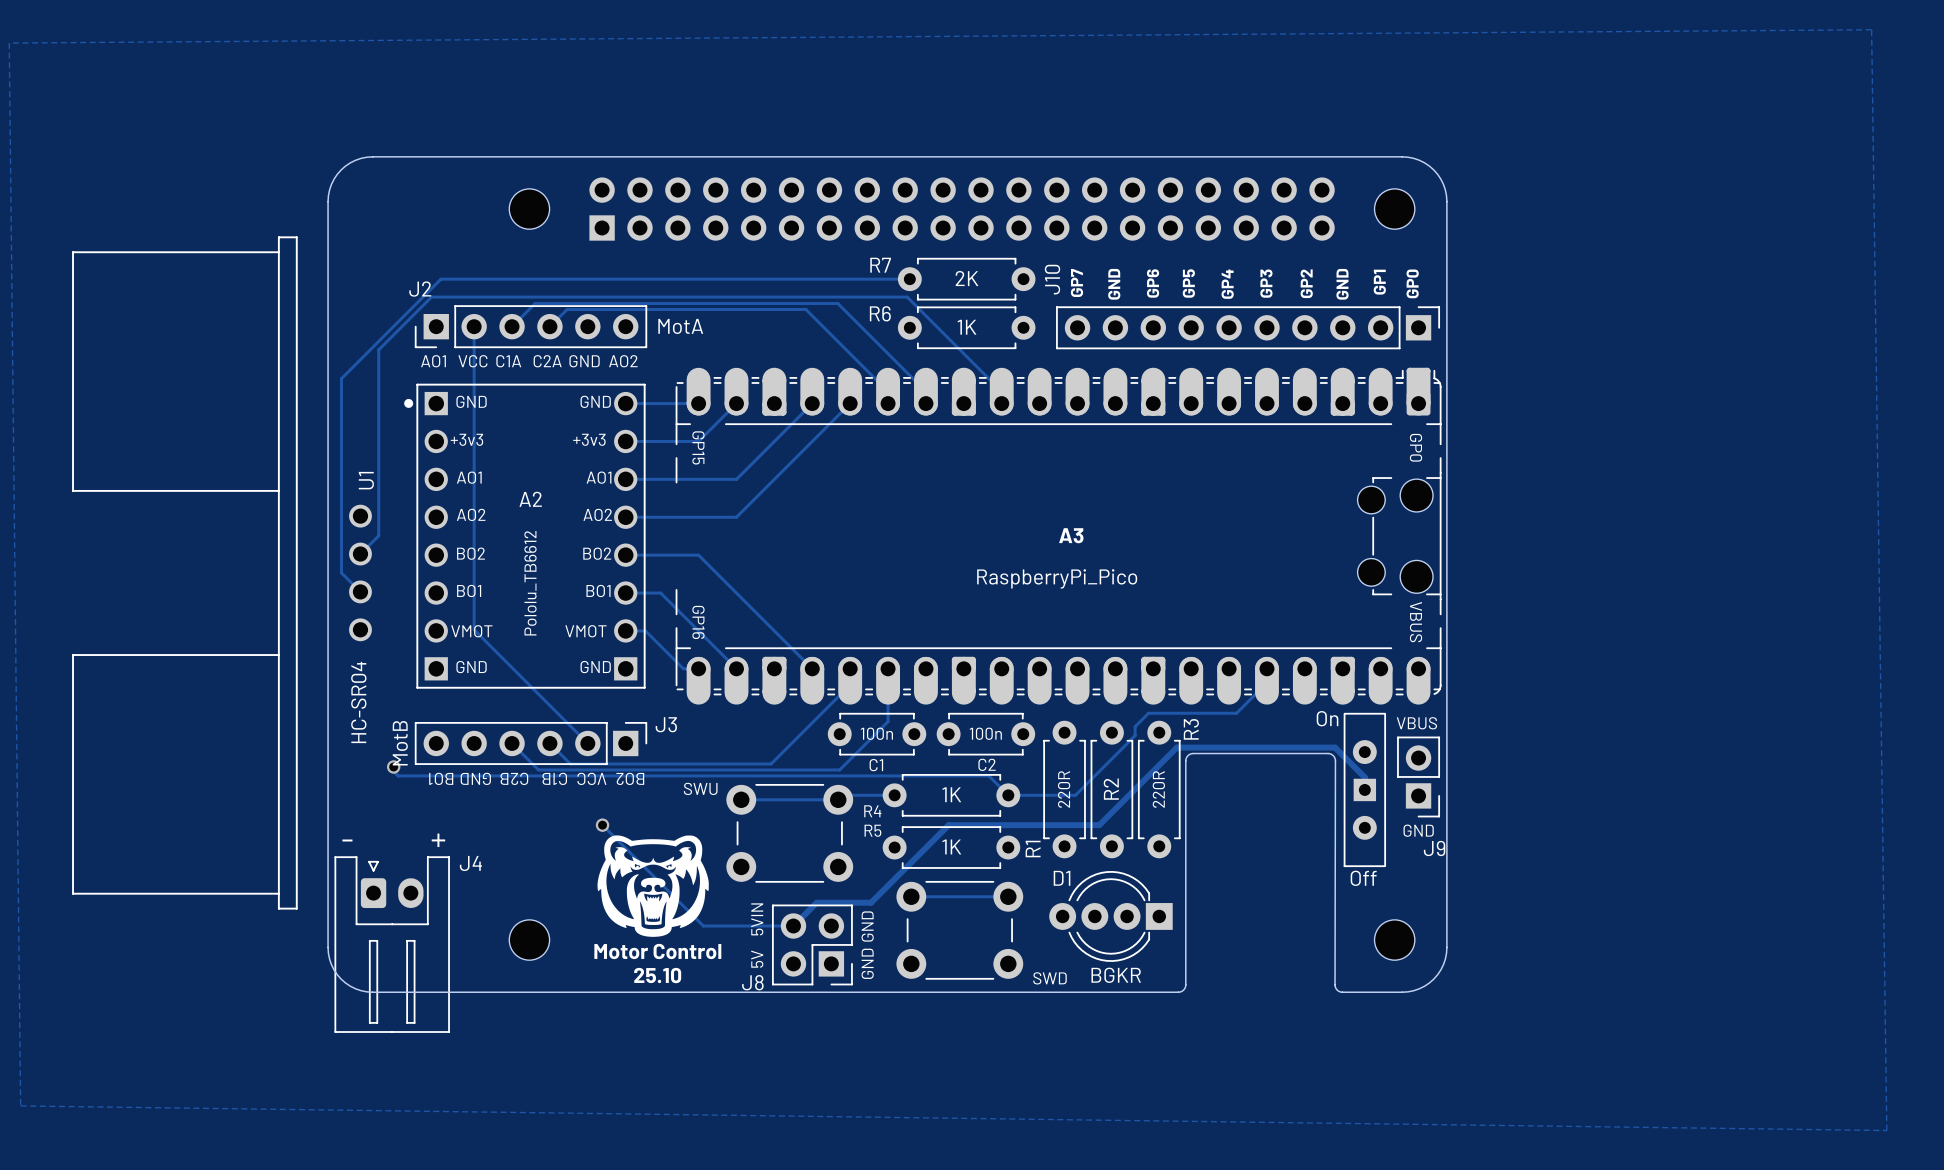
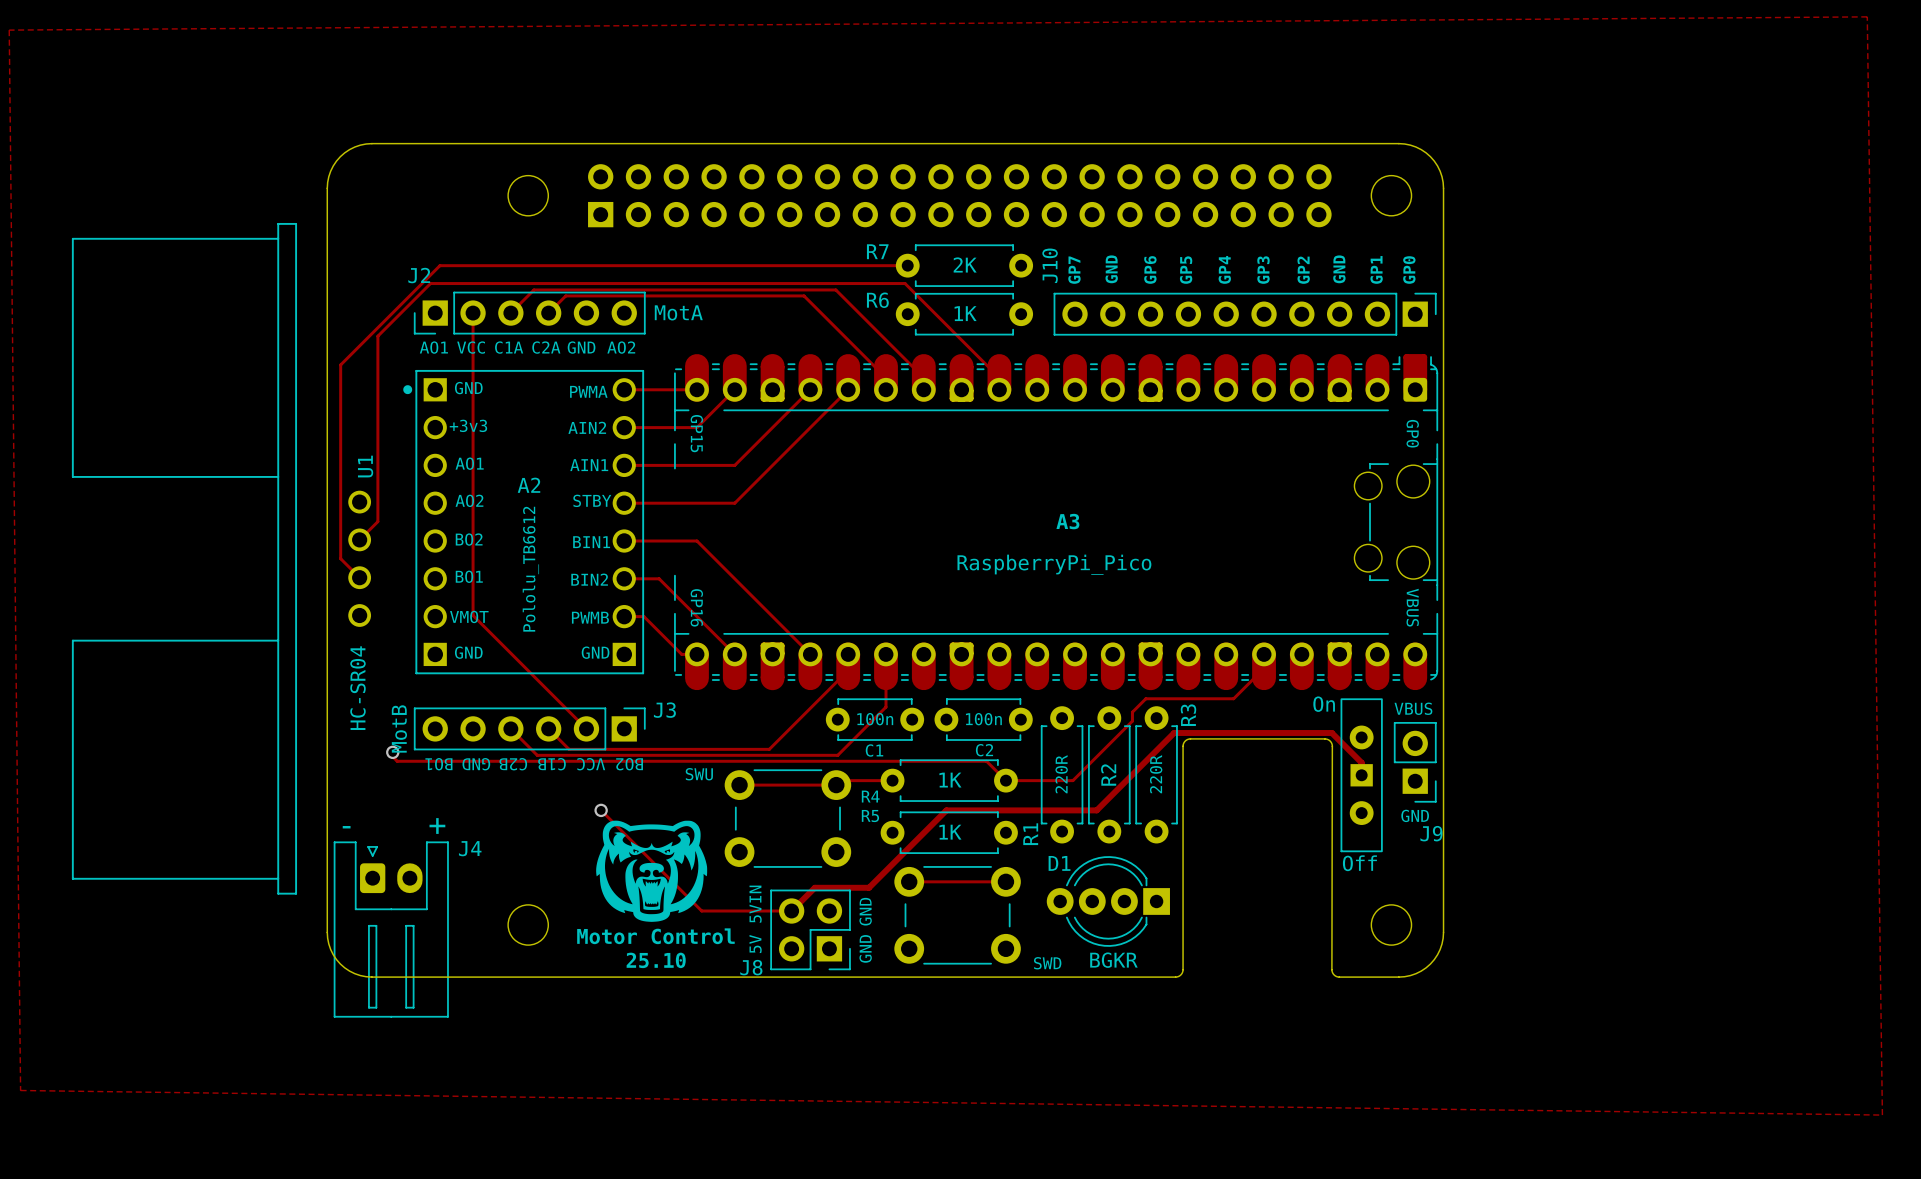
text: GND (595, 401) -> PWMA (588, 391)
text: +3v3 (589, 439) -> AIN2 (587, 427)
text: AO1 (599, 477) -> AIN1 (589, 465)
text: AO2 (597, 514) -> STBY (592, 500)
text: BO2 (597, 553) -> BIN1 (591, 542)
text: BO1 (598, 590) -> BIN2 (589, 579)
text: VMOT (585, 631) -> PWMB (590, 617)

